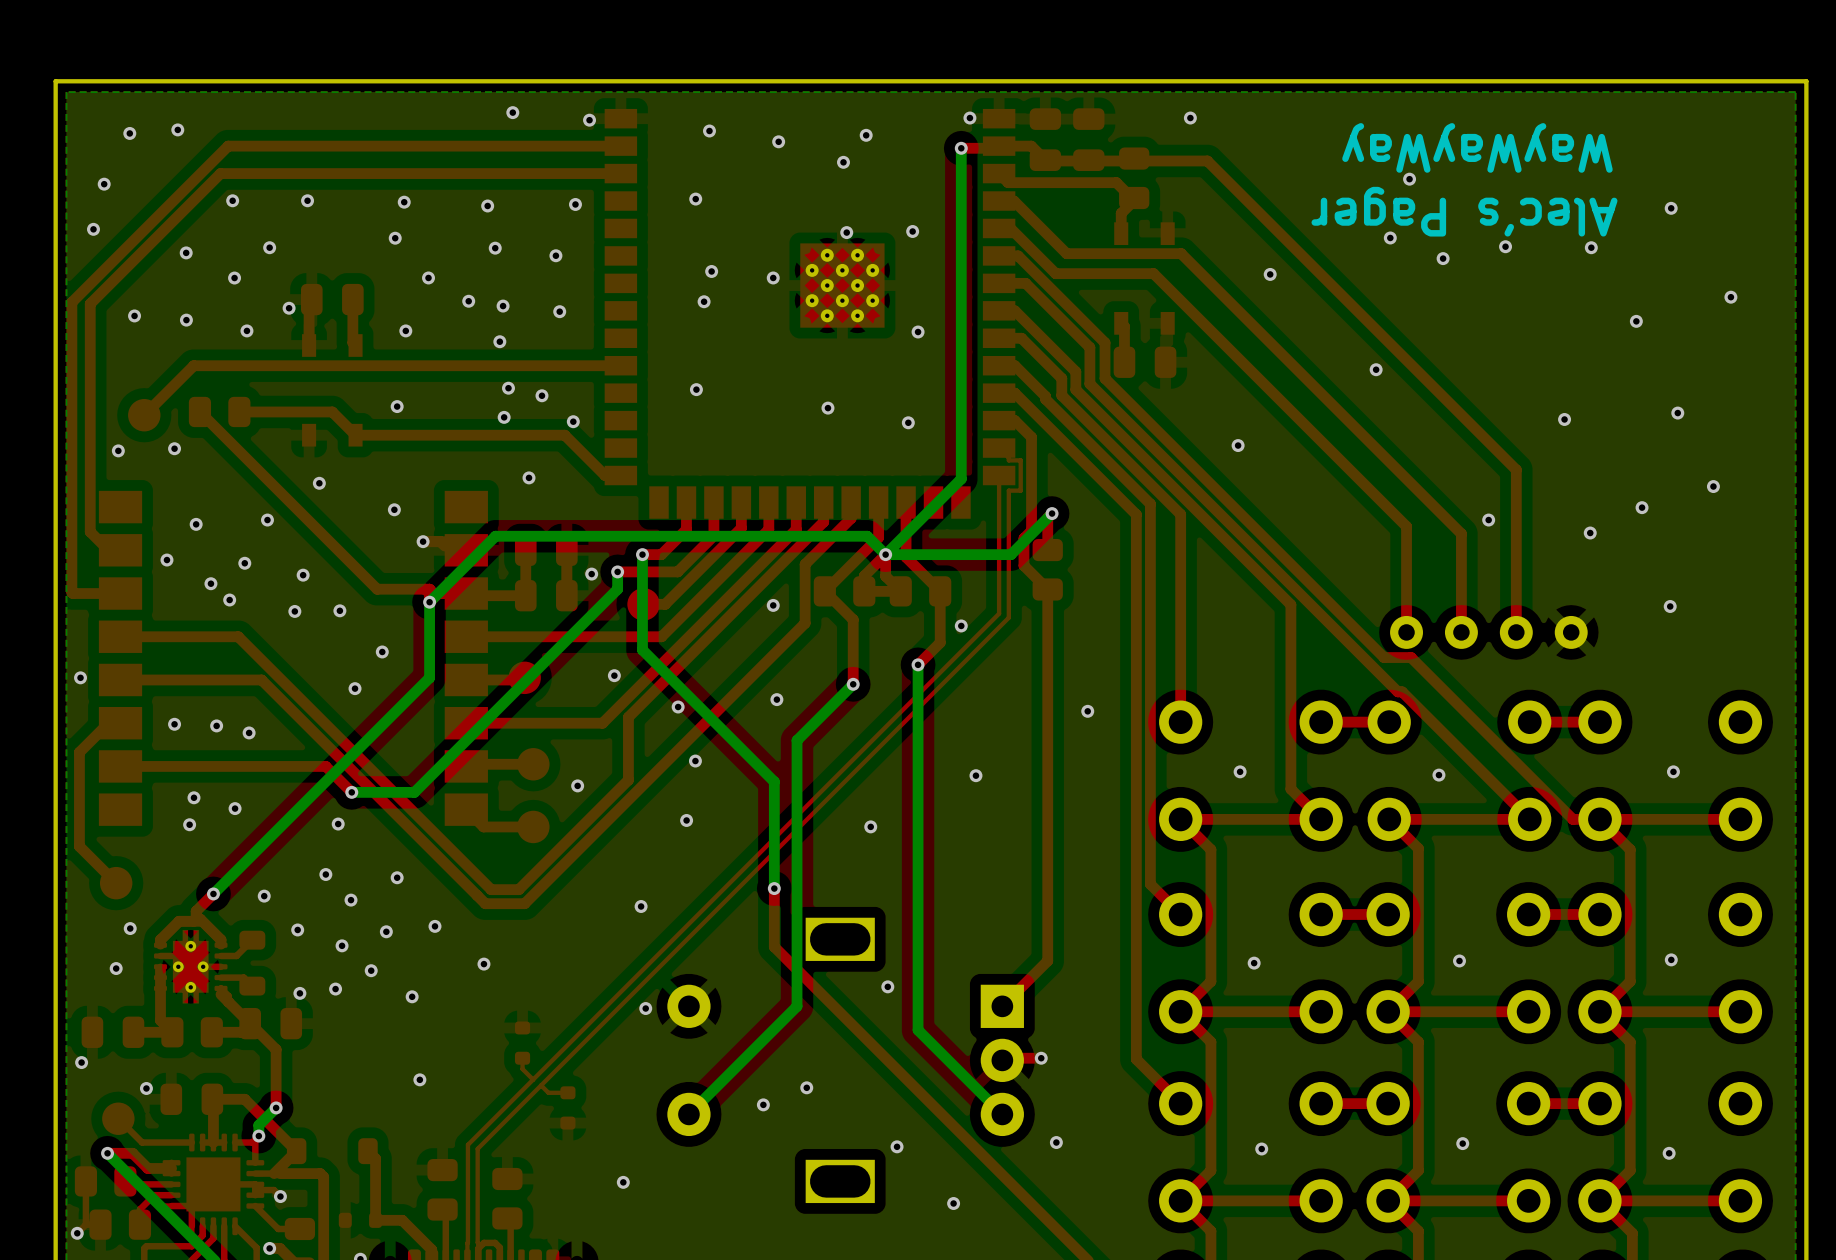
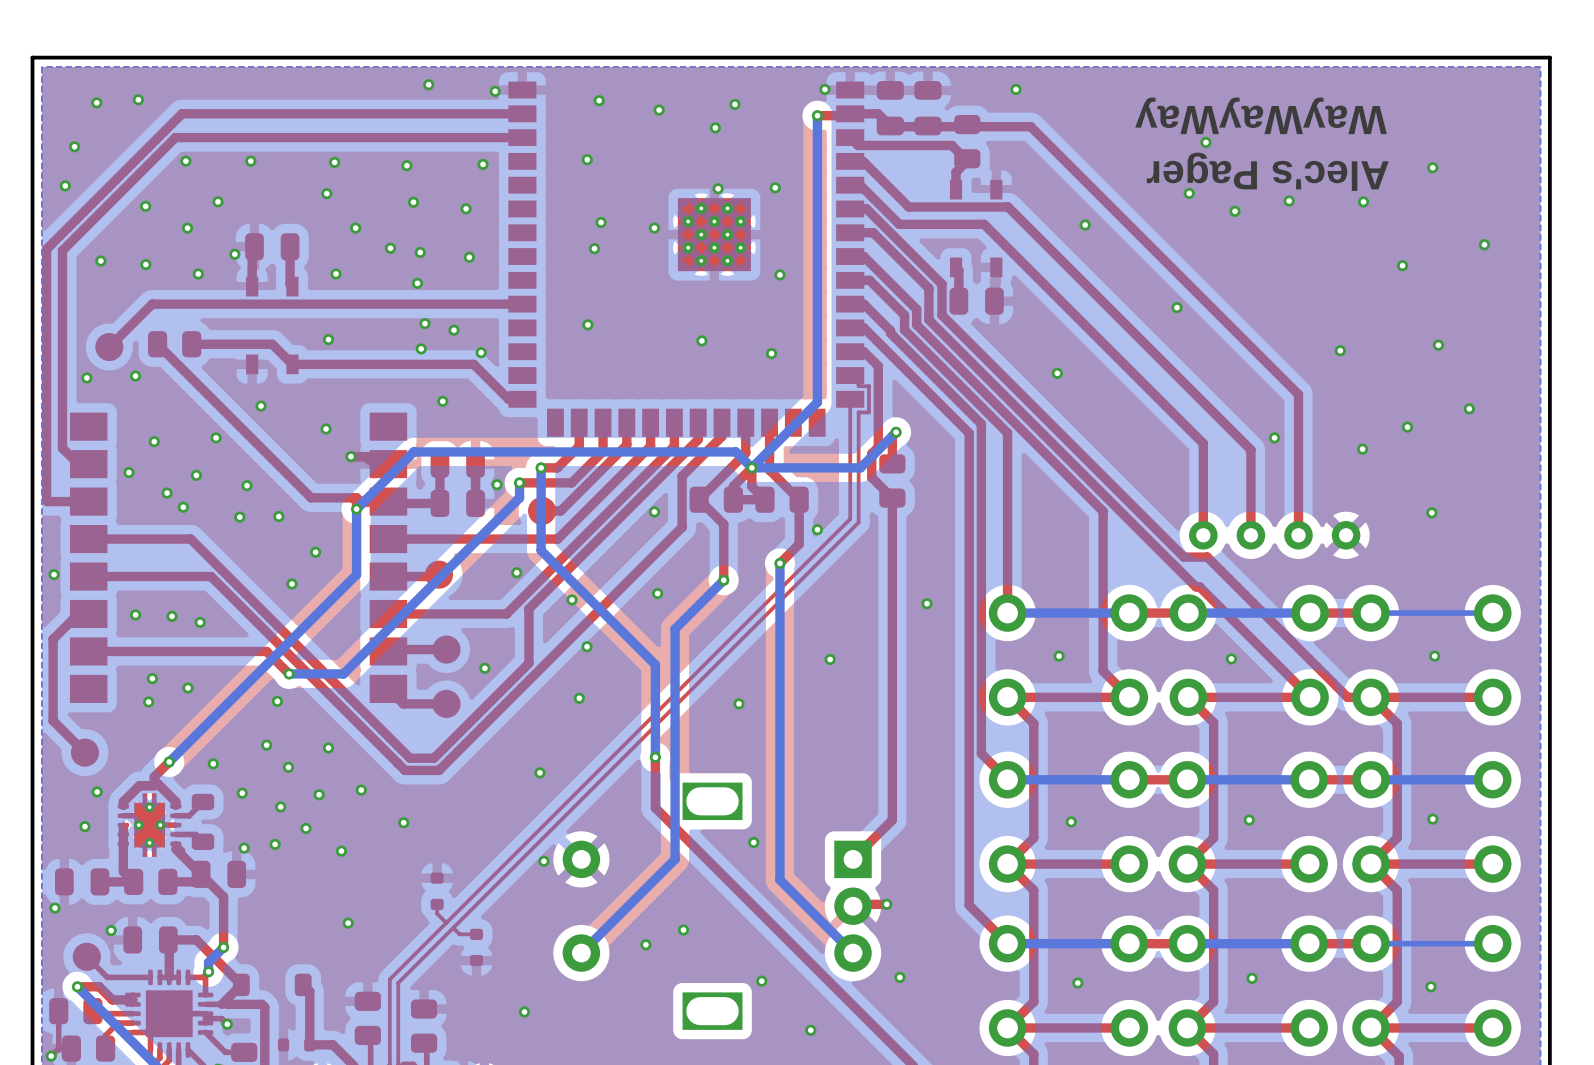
bottom track: none -> (1129, 613) (1007, 613)
bottom track: none -> (1310, 613) (1188, 613)
bottom track: none -> (1492, 613) (1370, 613)
bottom track: none -> (1129, 779) (1007, 779)
bottom track: none -> (1309, 779) (1187, 779)
bottom track: none -> (1492, 779) (1370, 779)
bottom track: none -> (1129, 943) (1007, 943)
bottom track: none -> (1309, 943) (1187, 943)
bottom track: none -> (1492, 943) (1370, 943)

